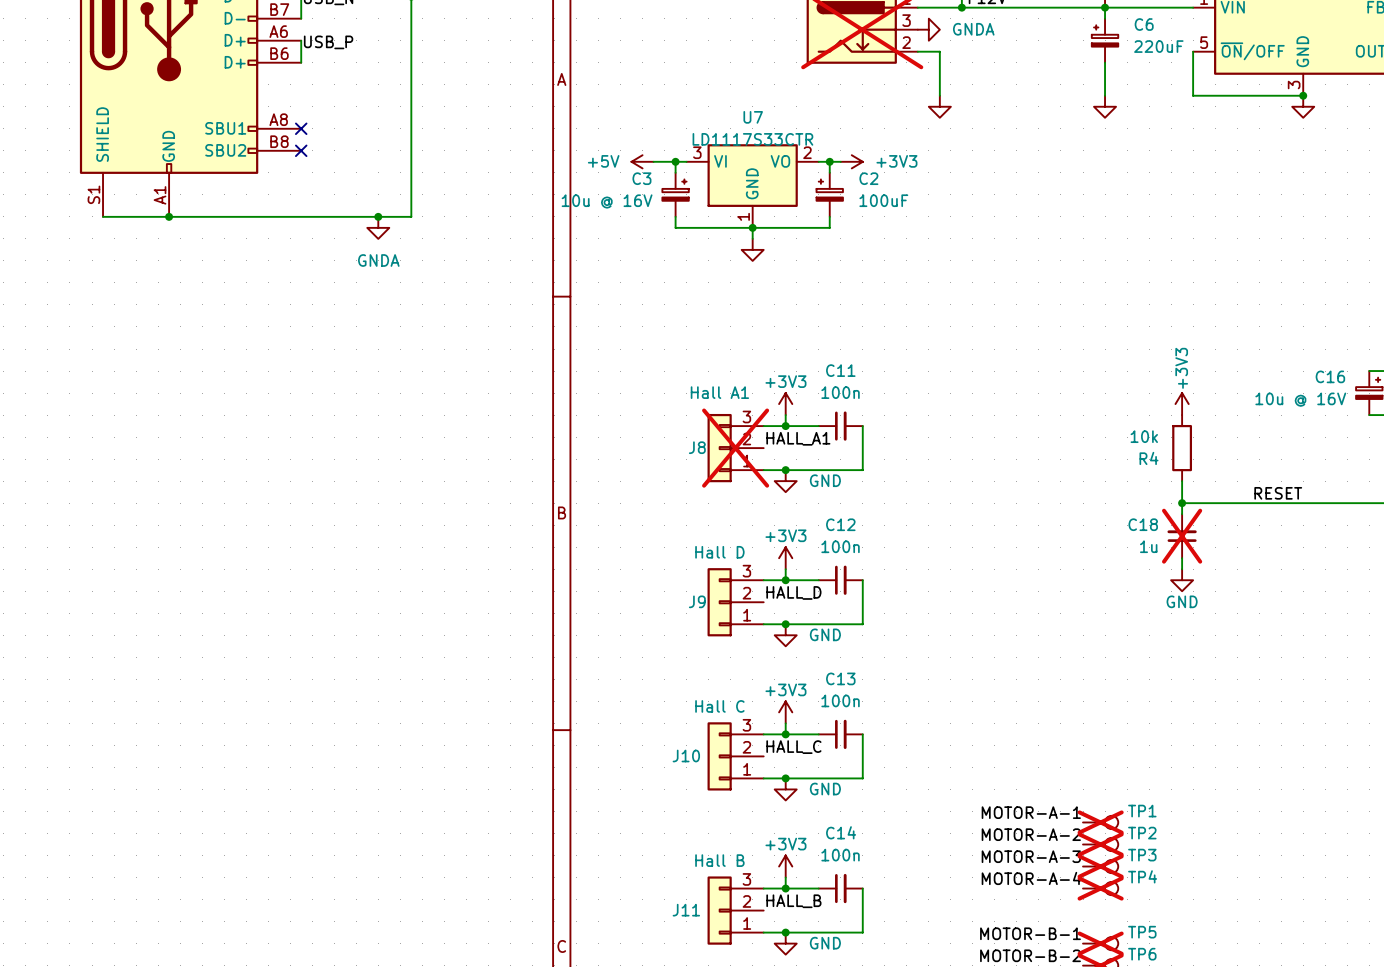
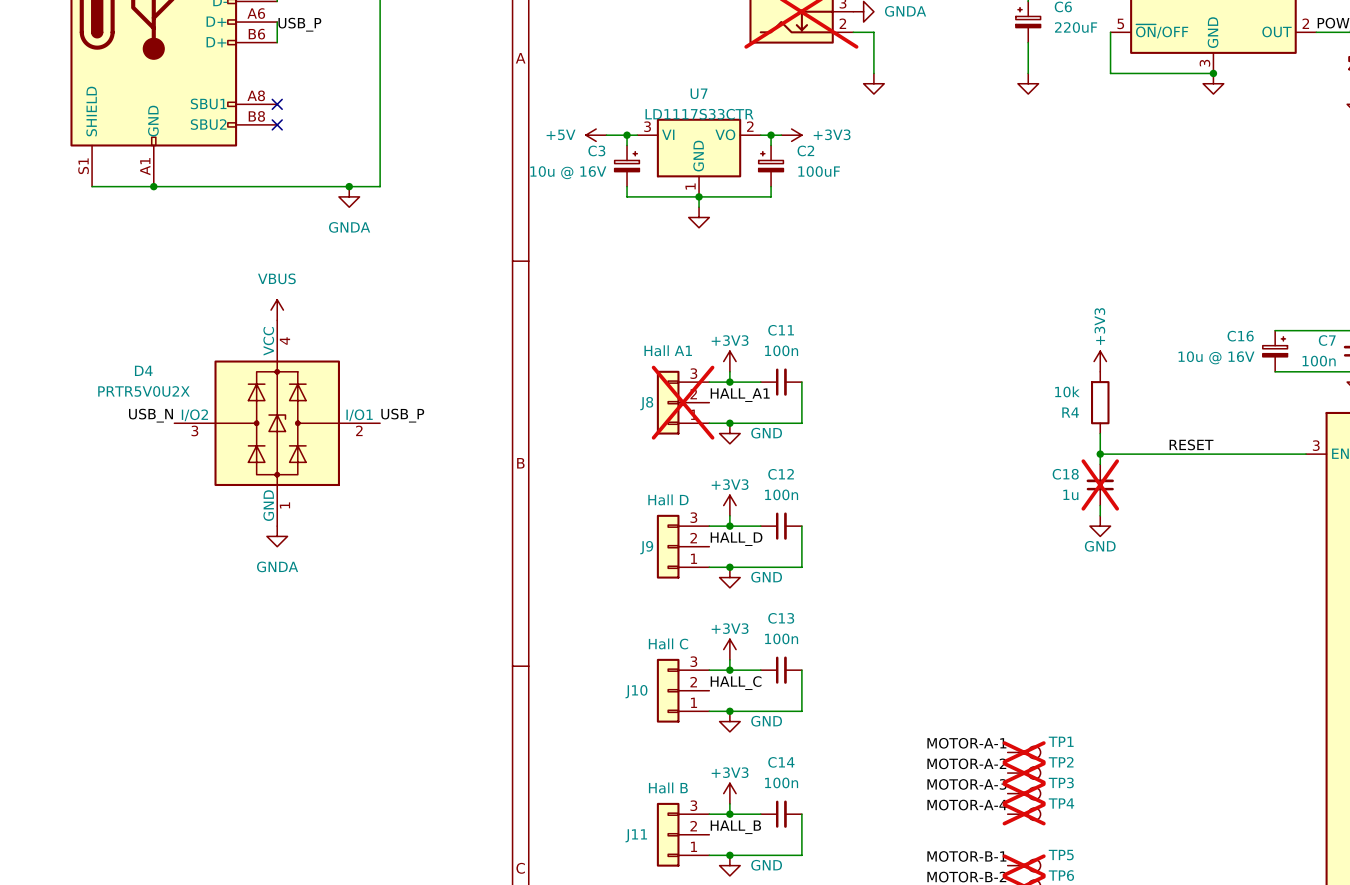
power symbol: none -> VBUS (277, 310)
label: none -> USB_N (150, 415)
label: none -> USB_P (402, 415)
D4: none -> PRTR5V0U2X (277, 423)
power symbol: none -> GNDA (277, 536)

